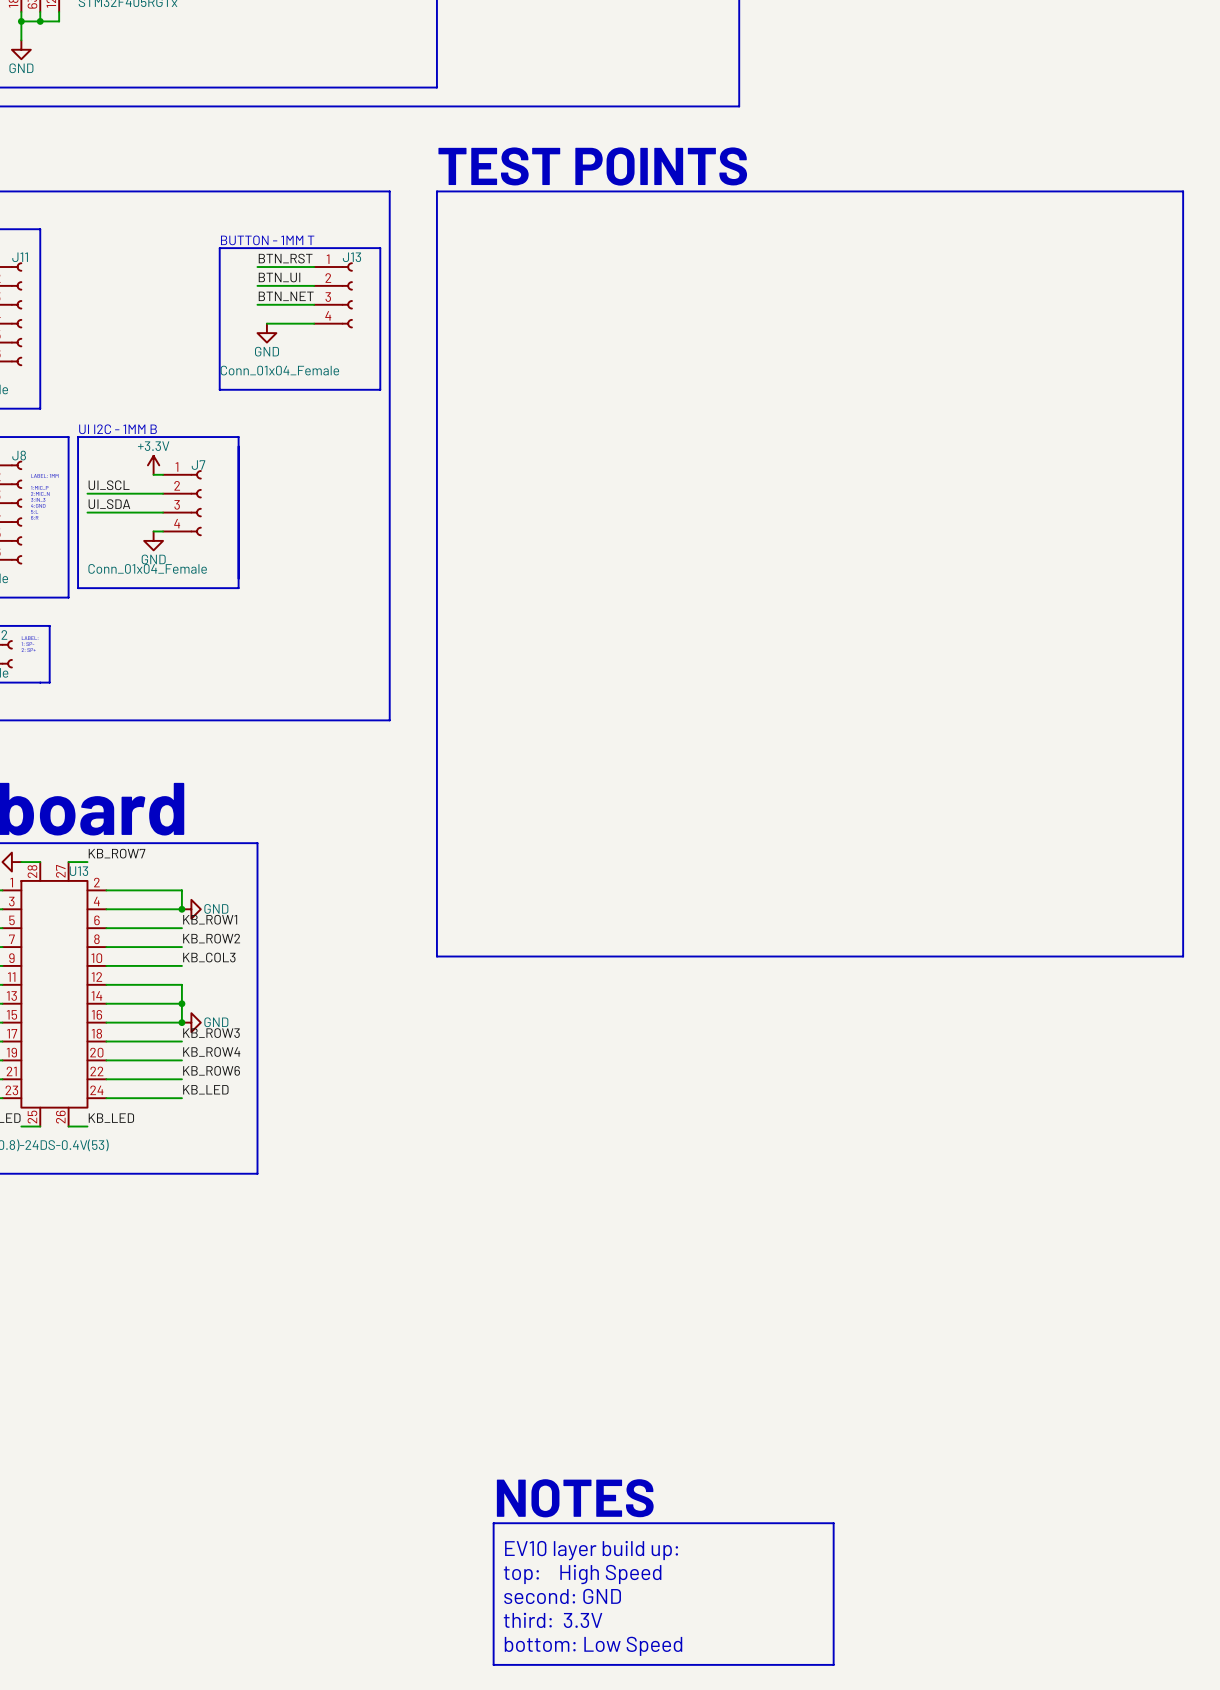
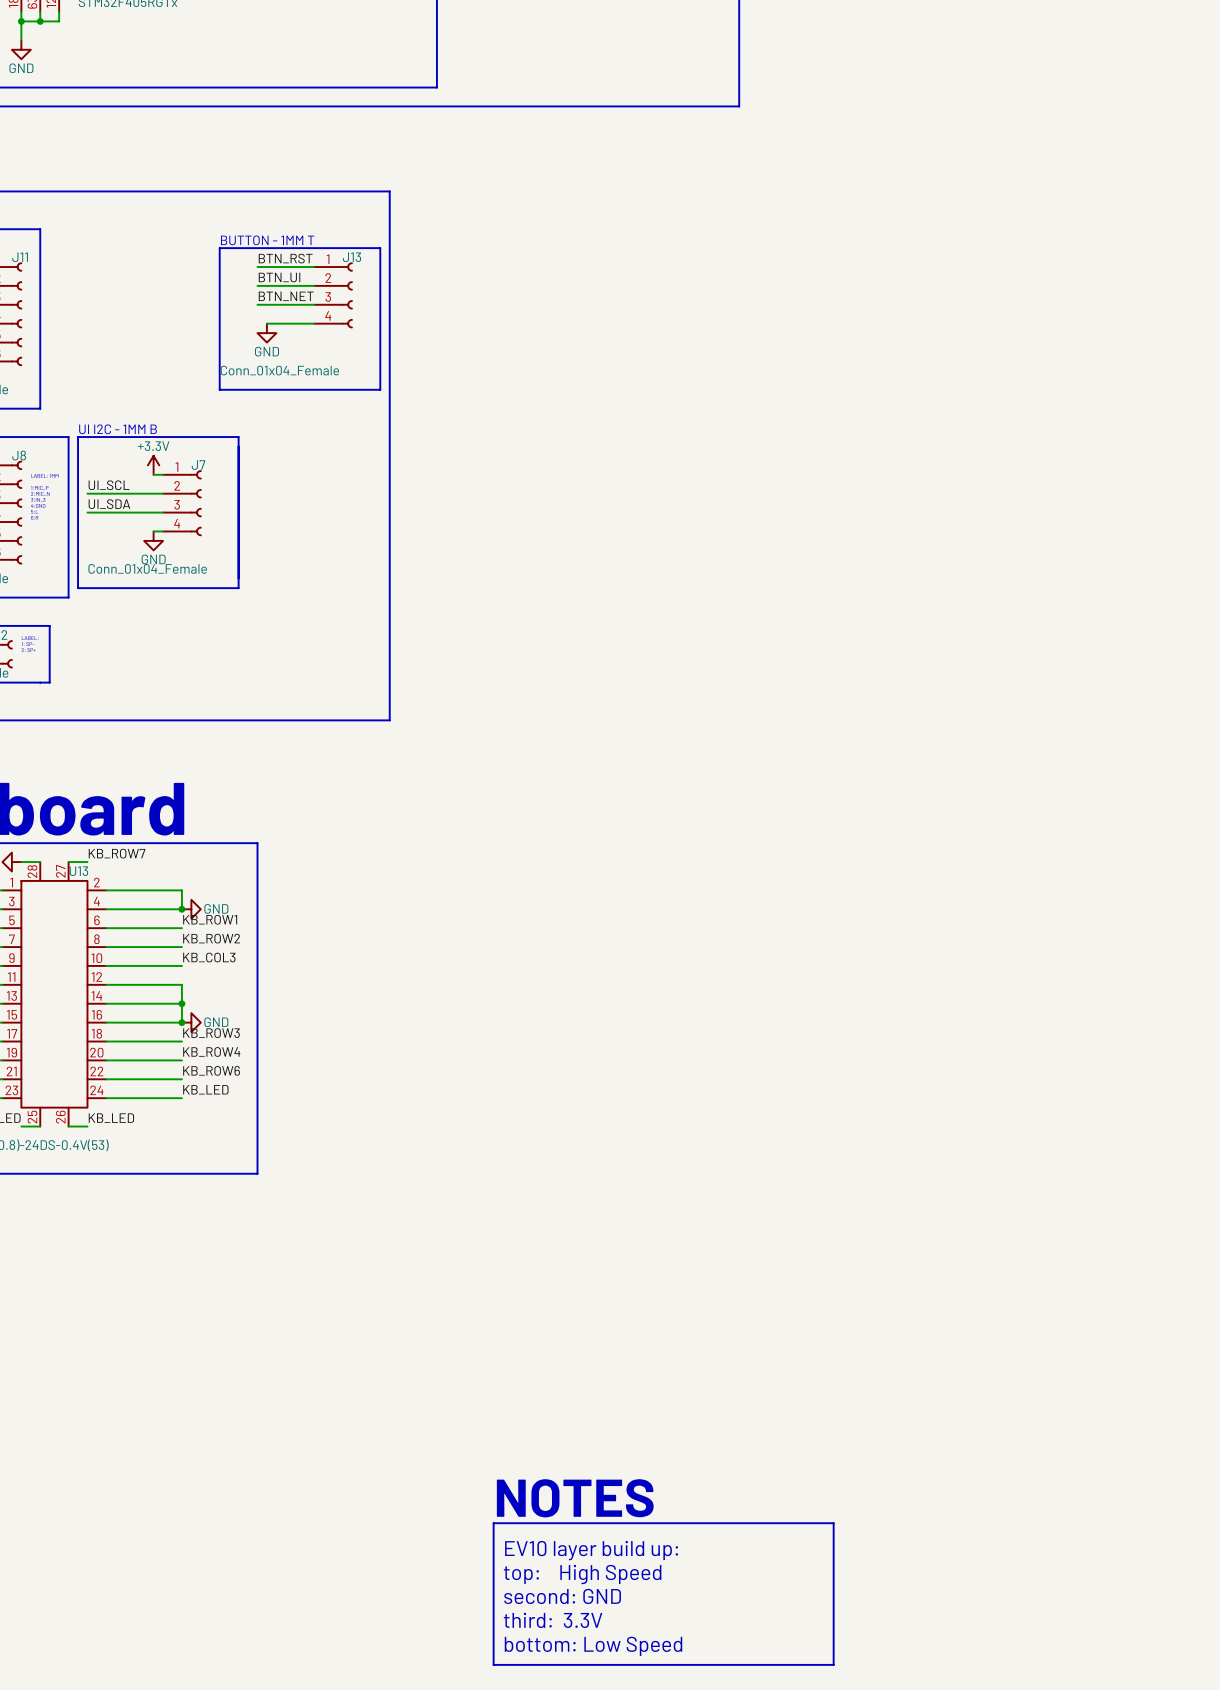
text: TEST POINTS (592, 166) -> none
line: (436, 191) (1183, 191) (1183, 956) (436, 956) (436, 191) -> none

